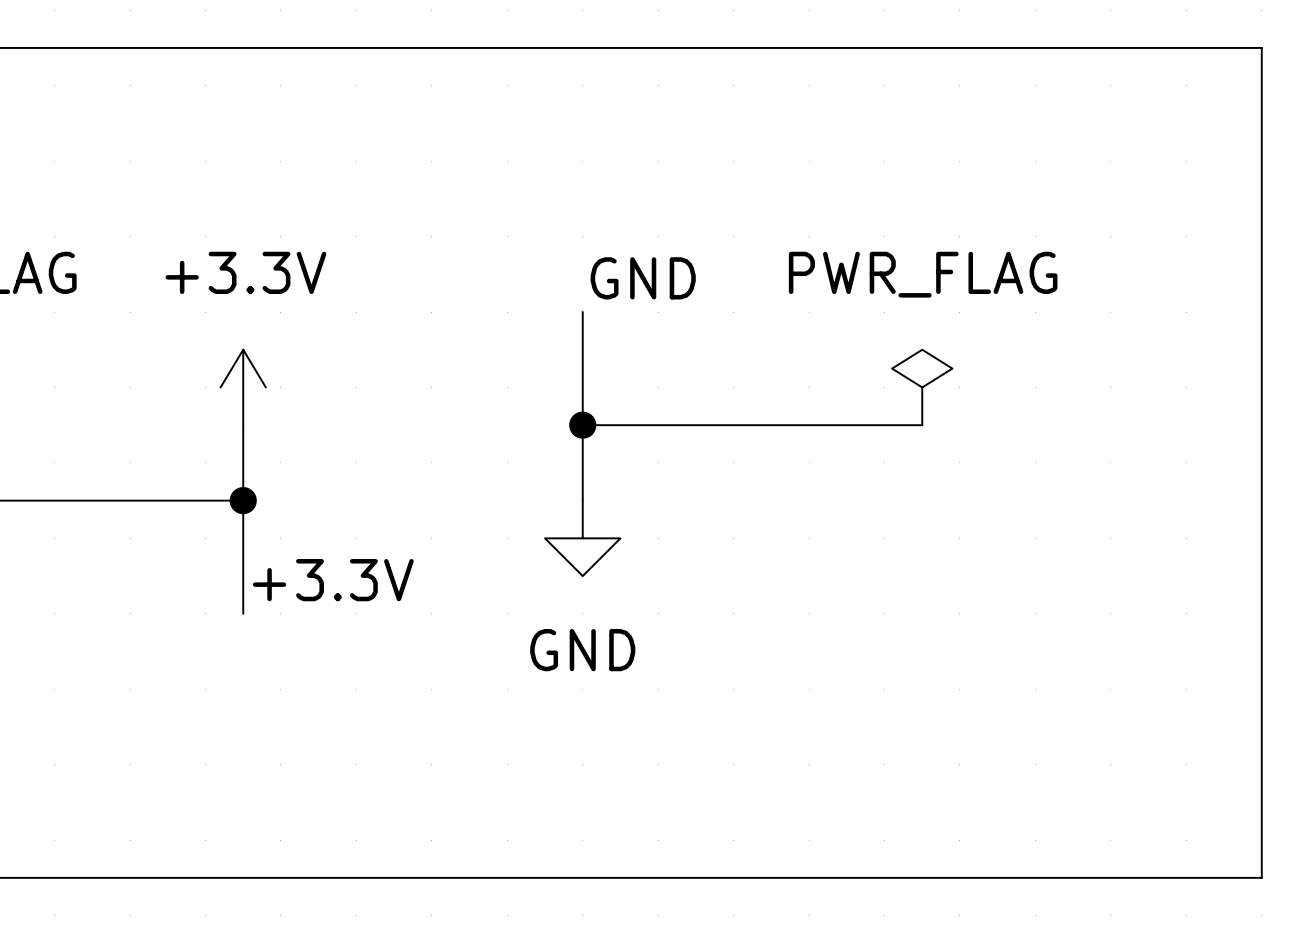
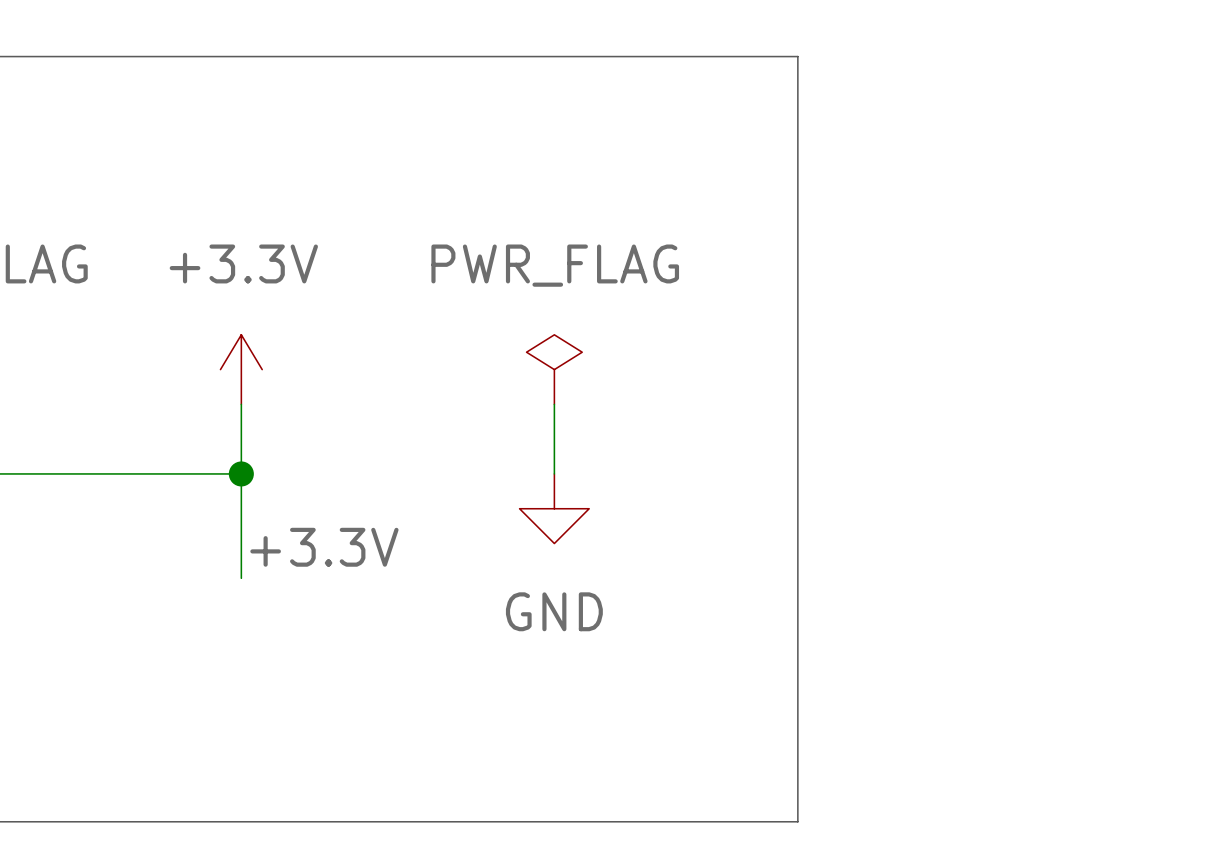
line: (846, 47) (1261, 47) (1261, 877) (846, 877) -> (797, 56) (797, 821)
label: GND (643, 278) -> none
wire: (582, 312) (582, 425) (922, 425) -> none
power symbol position: PWR_FLAG (922, 387) -> PWR_FLAG (554, 369)
junction: (582, 425) -> none

